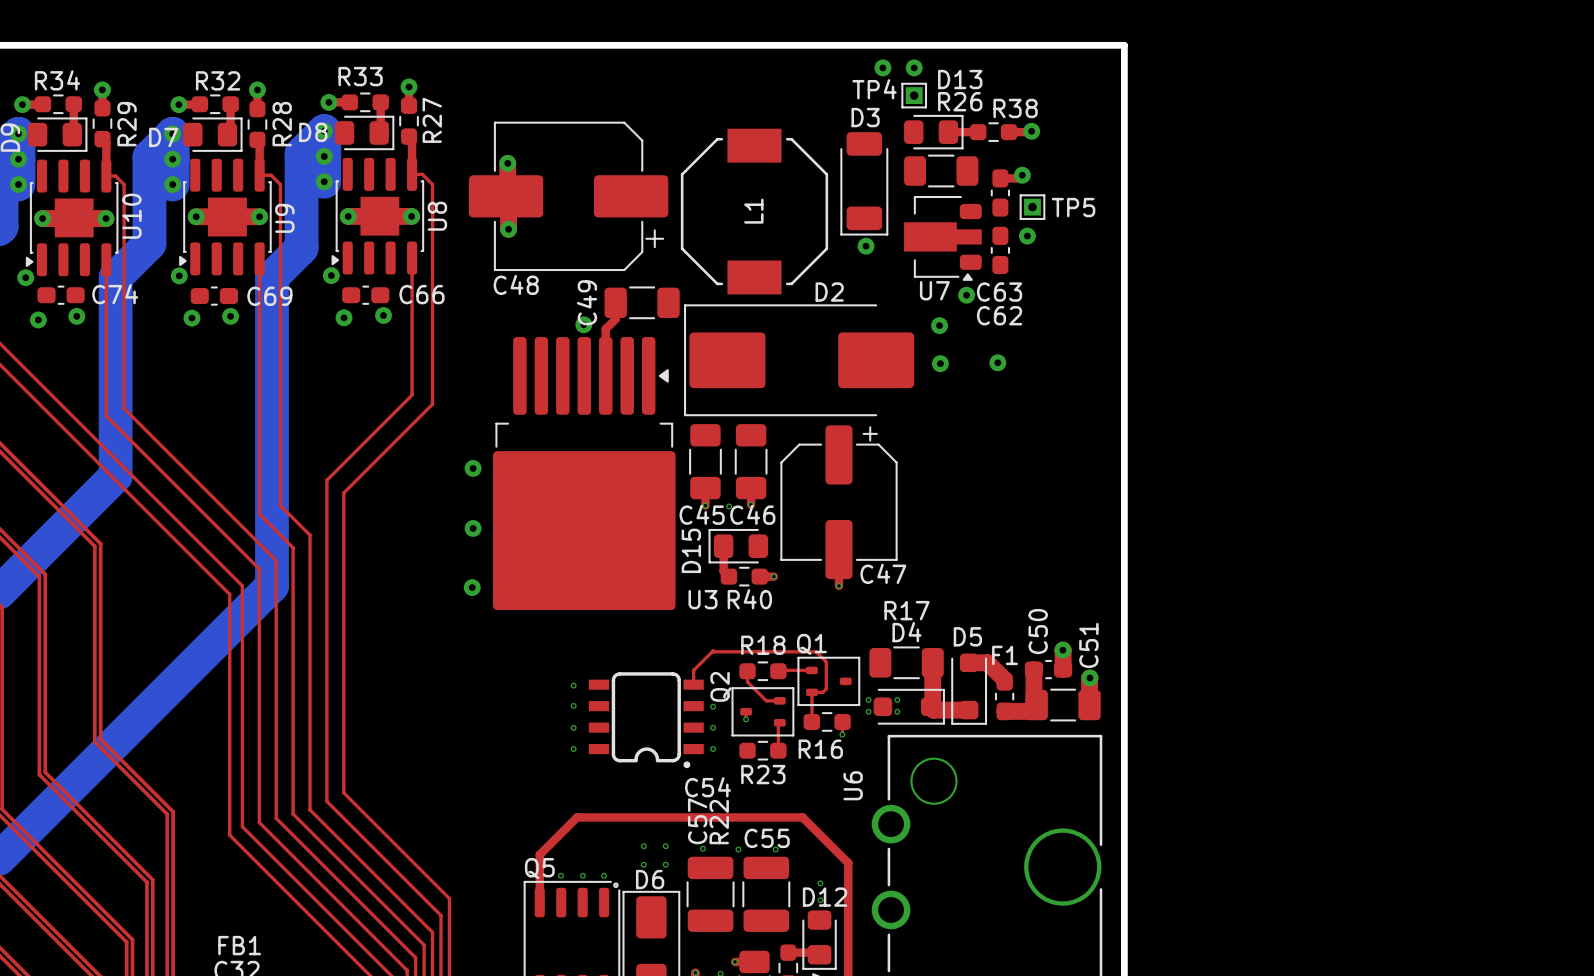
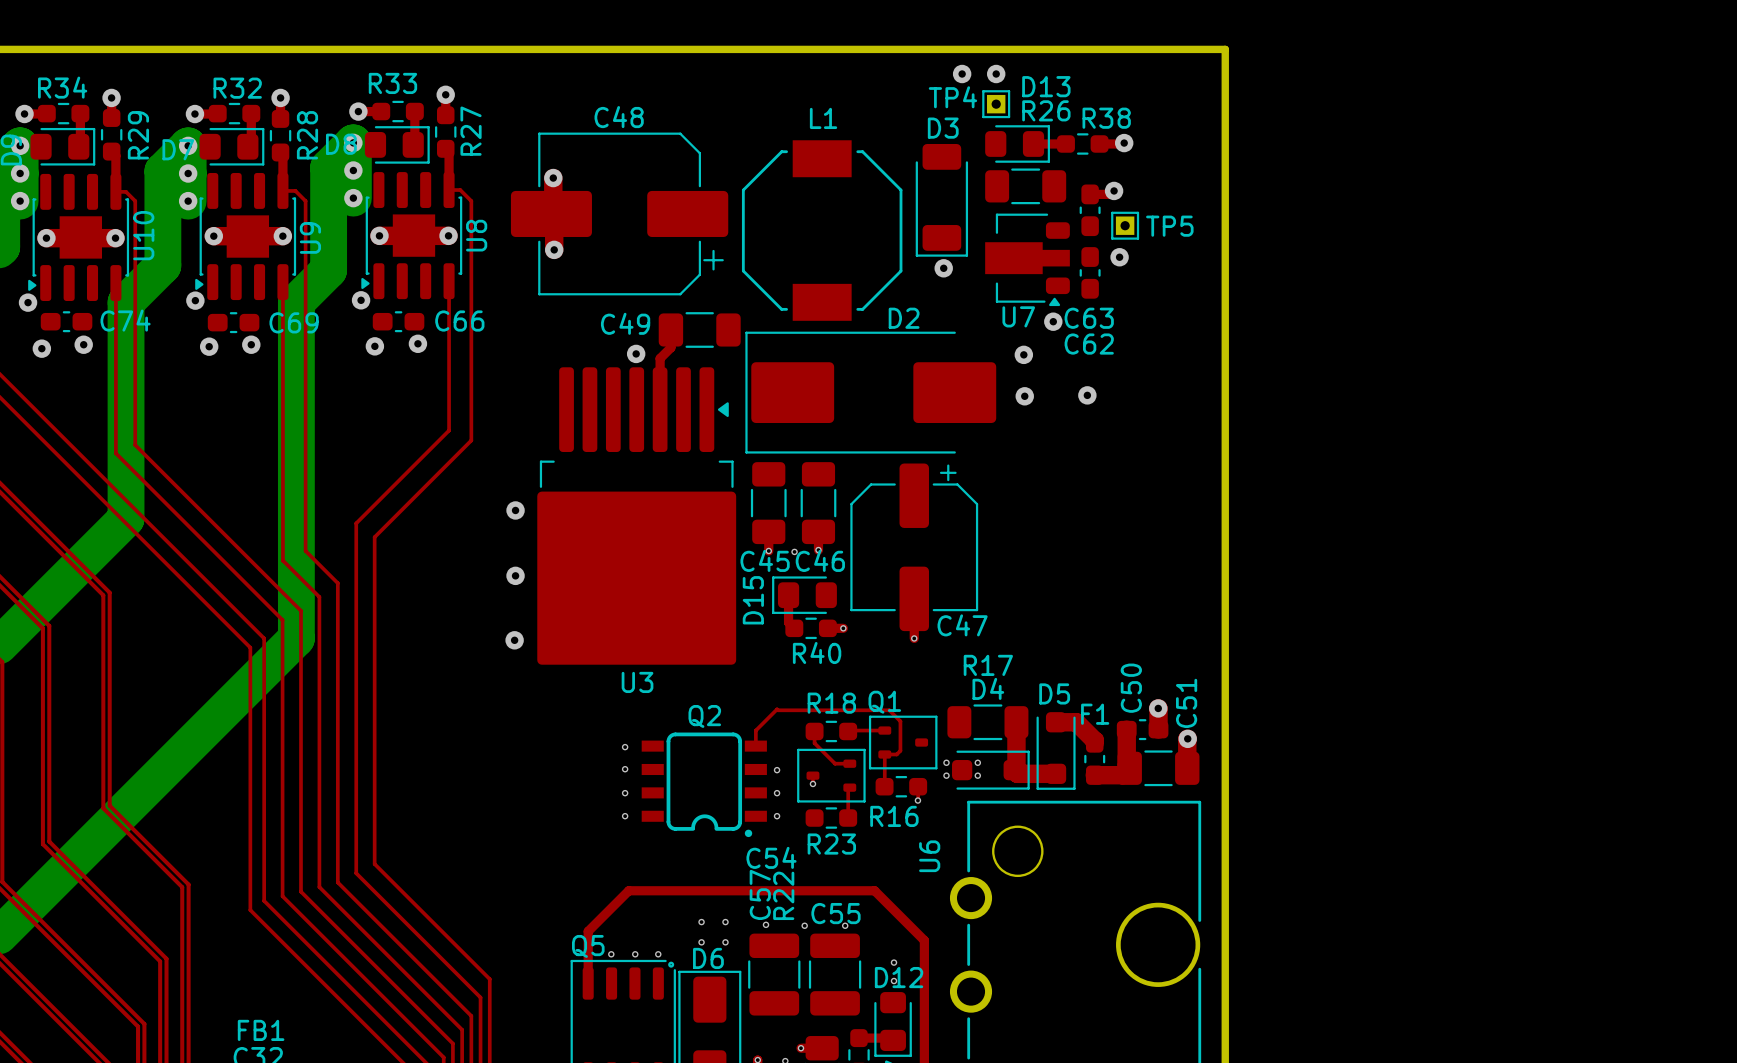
L1 name rotation: 0° (753, 211) -> 90° clockwise (823, 118)
L1 name position: L1 (753, 211) -> L1 (823, 118)
C48 name position: C48 (516, 284) -> C48 (619, 117)
C49 name rotation: 0° (586, 302) -> 90° clockwise (625, 323)
U3 name position: U3 (703, 599) -> U3 (637, 682)
Q2 name rotation: 0° (720, 686) -> 90° clockwise (704, 716)
Q2 name position: Q2 (720, 686) -> Q2 (704, 716)

